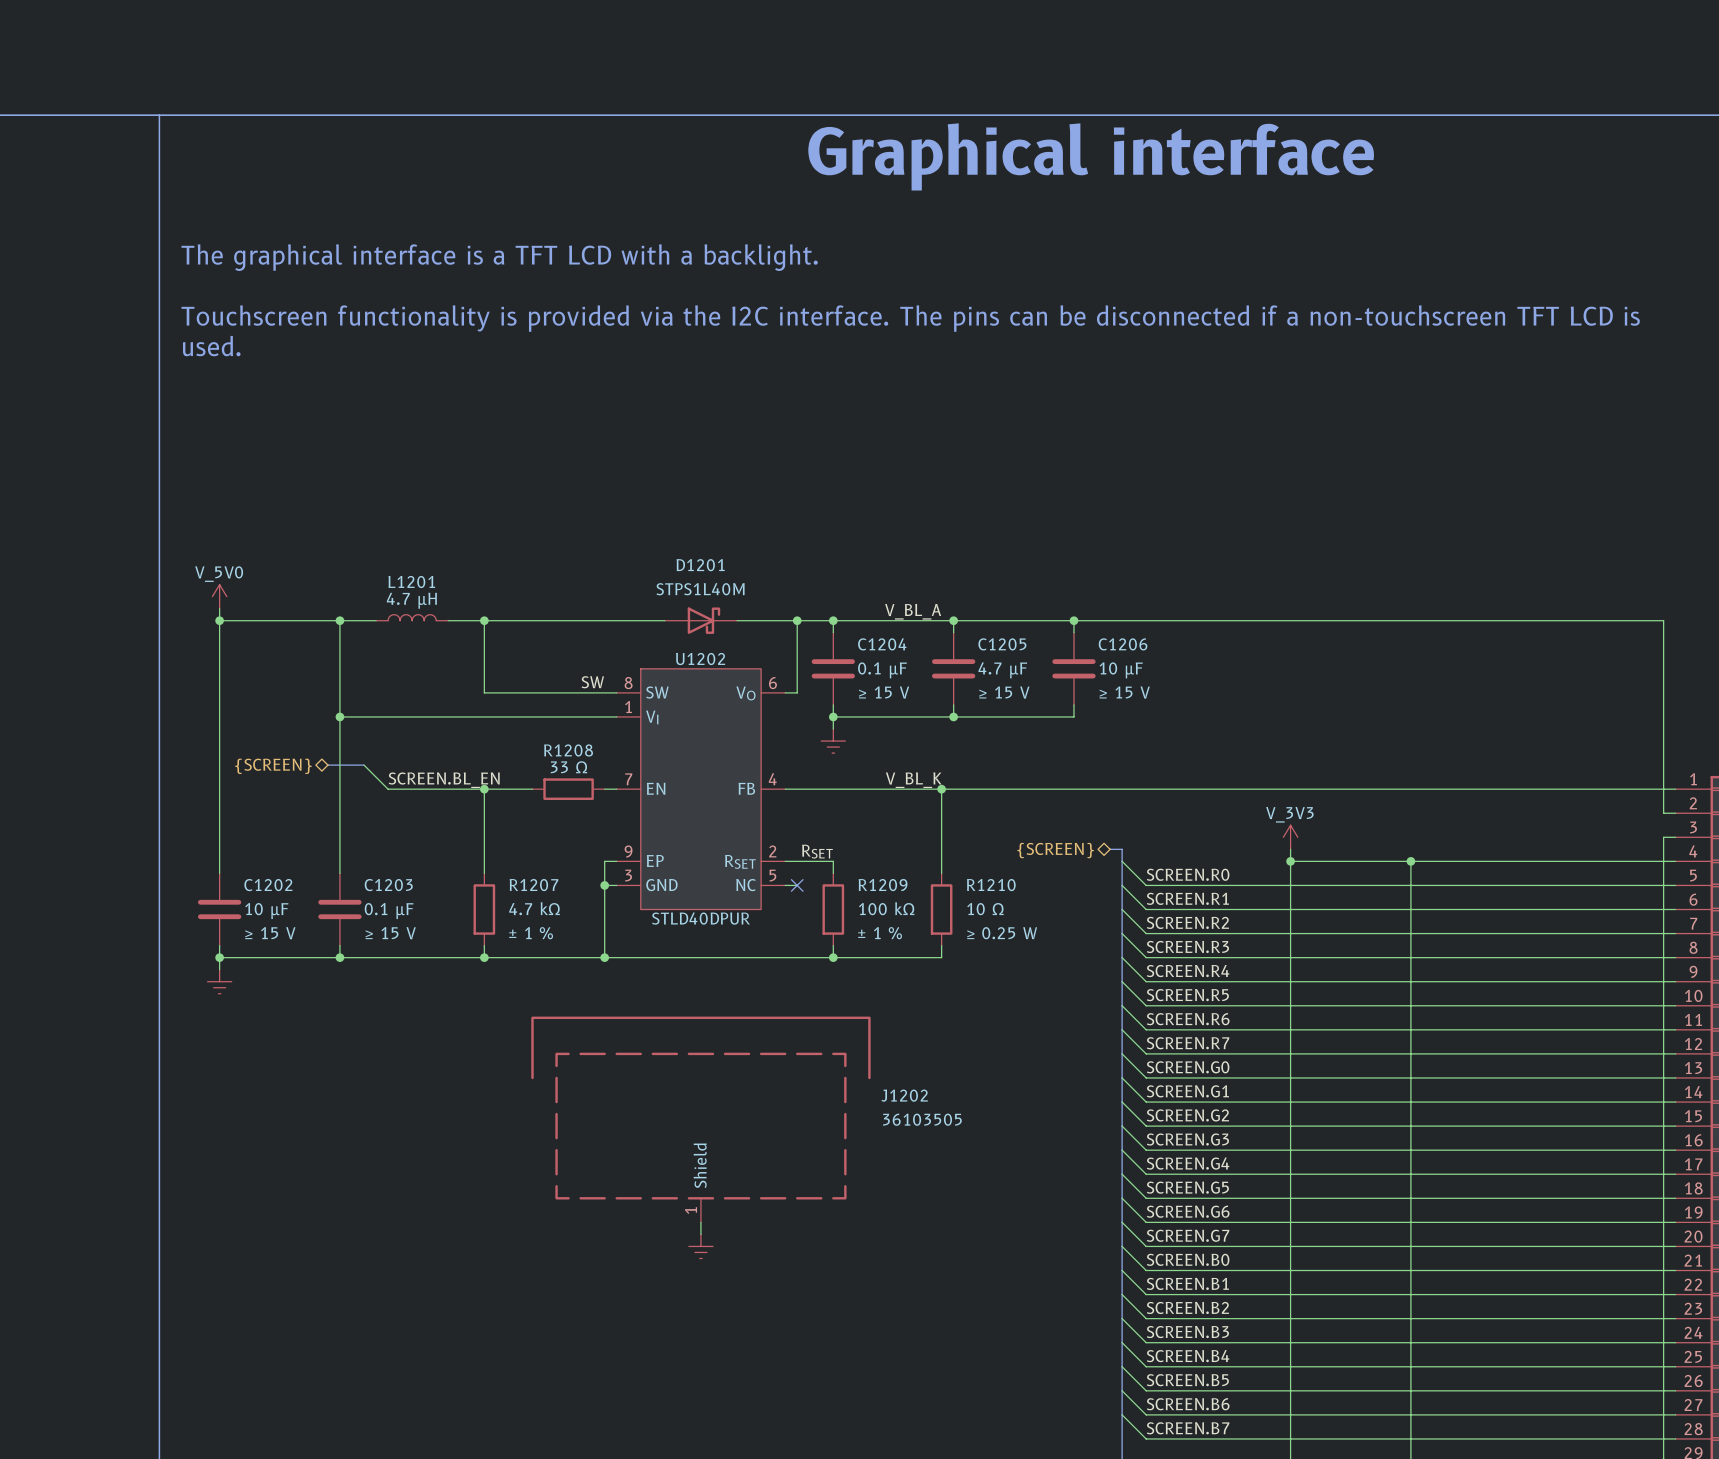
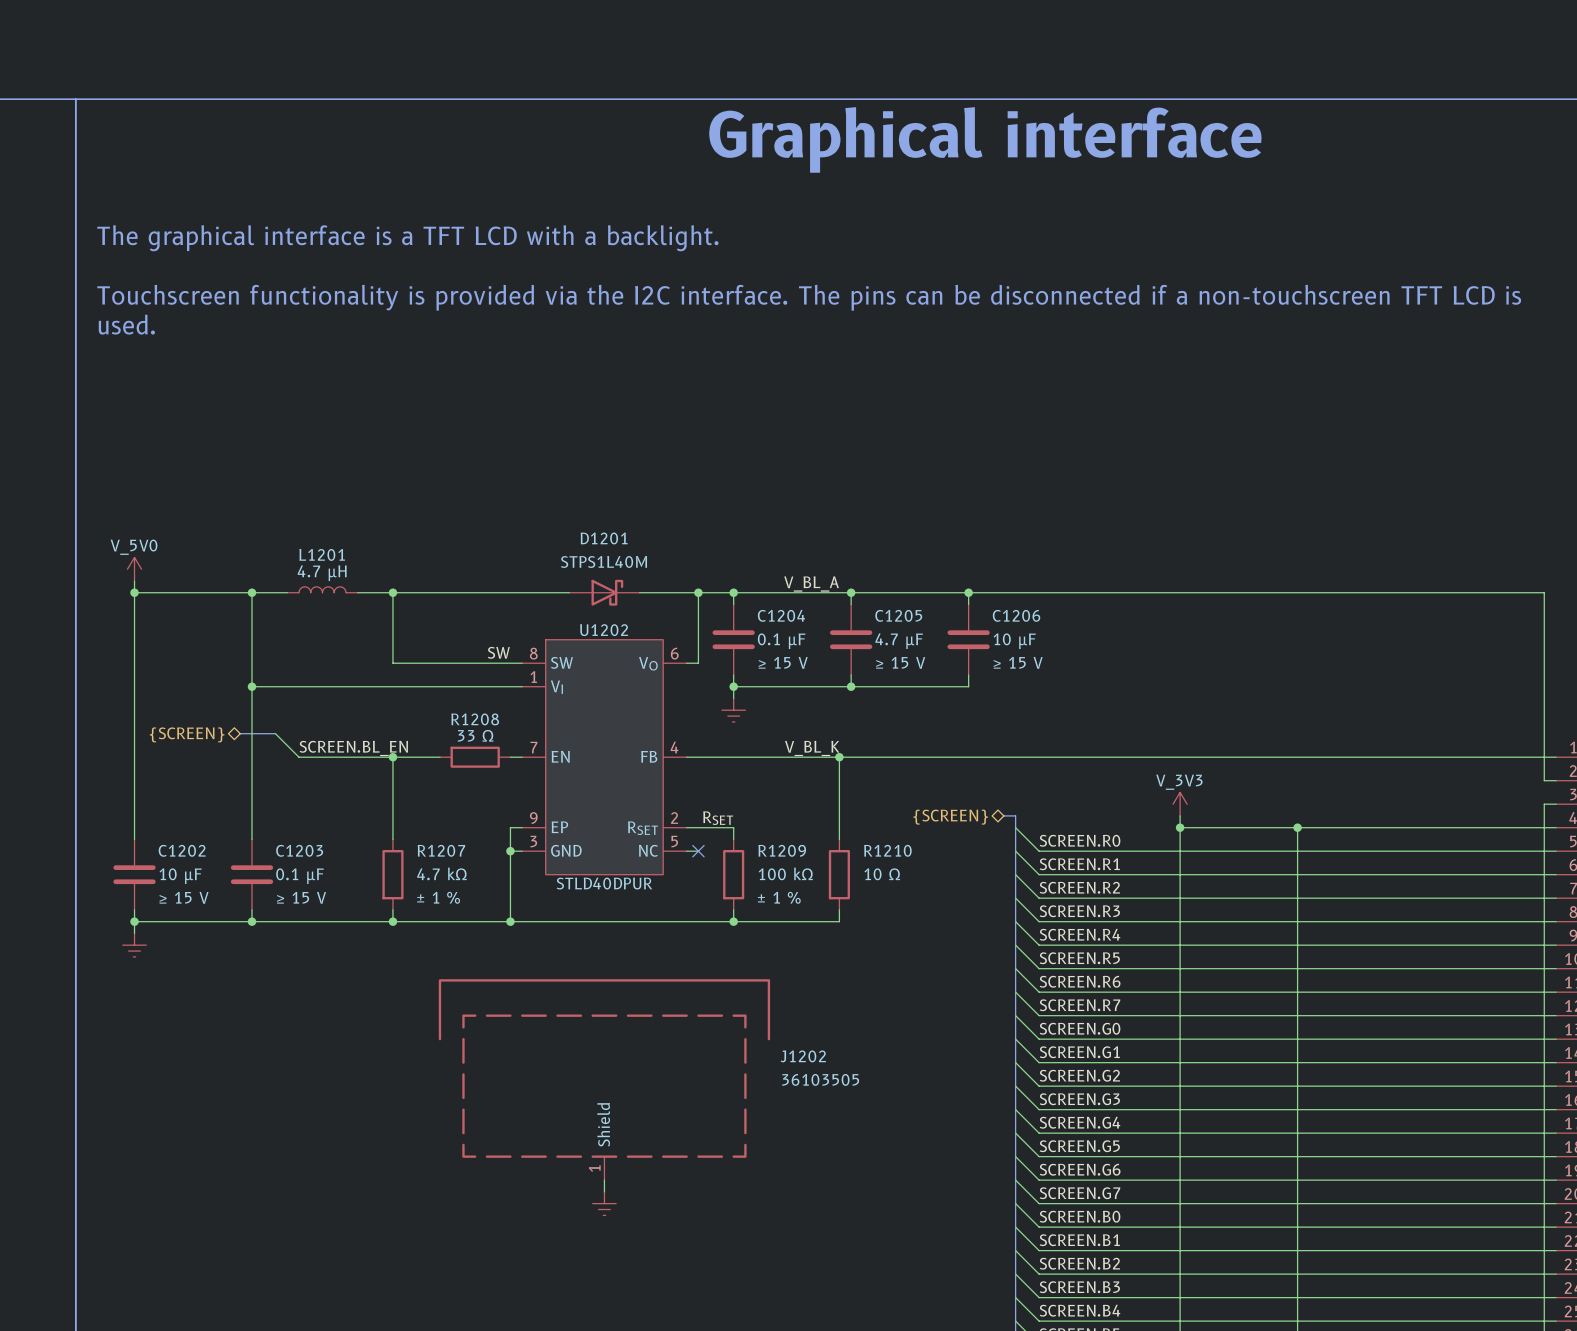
R1210 text: ≥ 0.25 W (1002, 933) -> none

